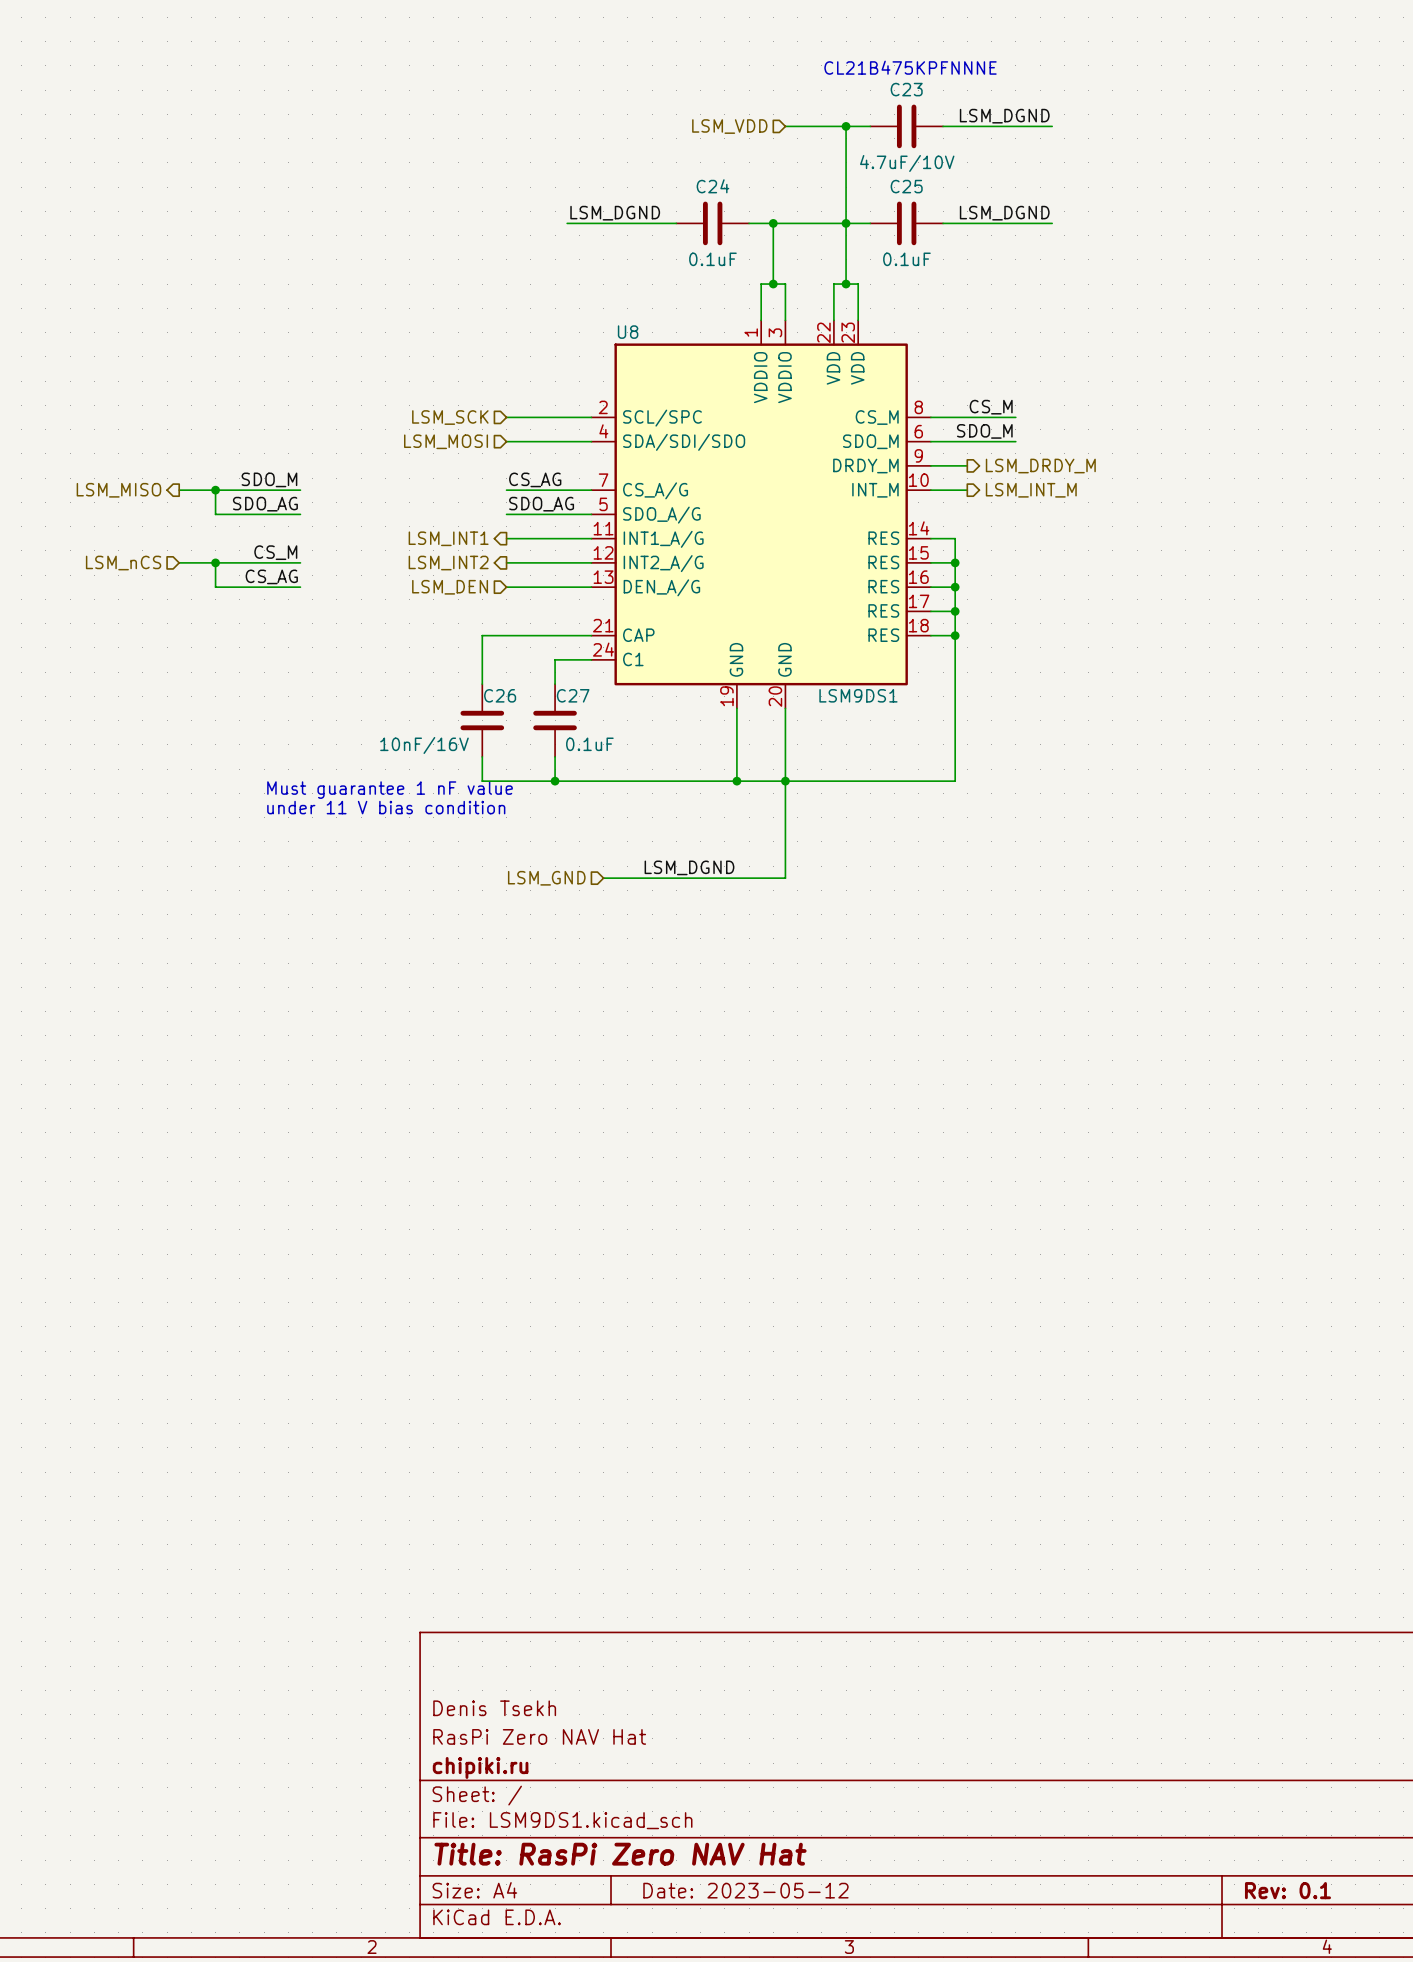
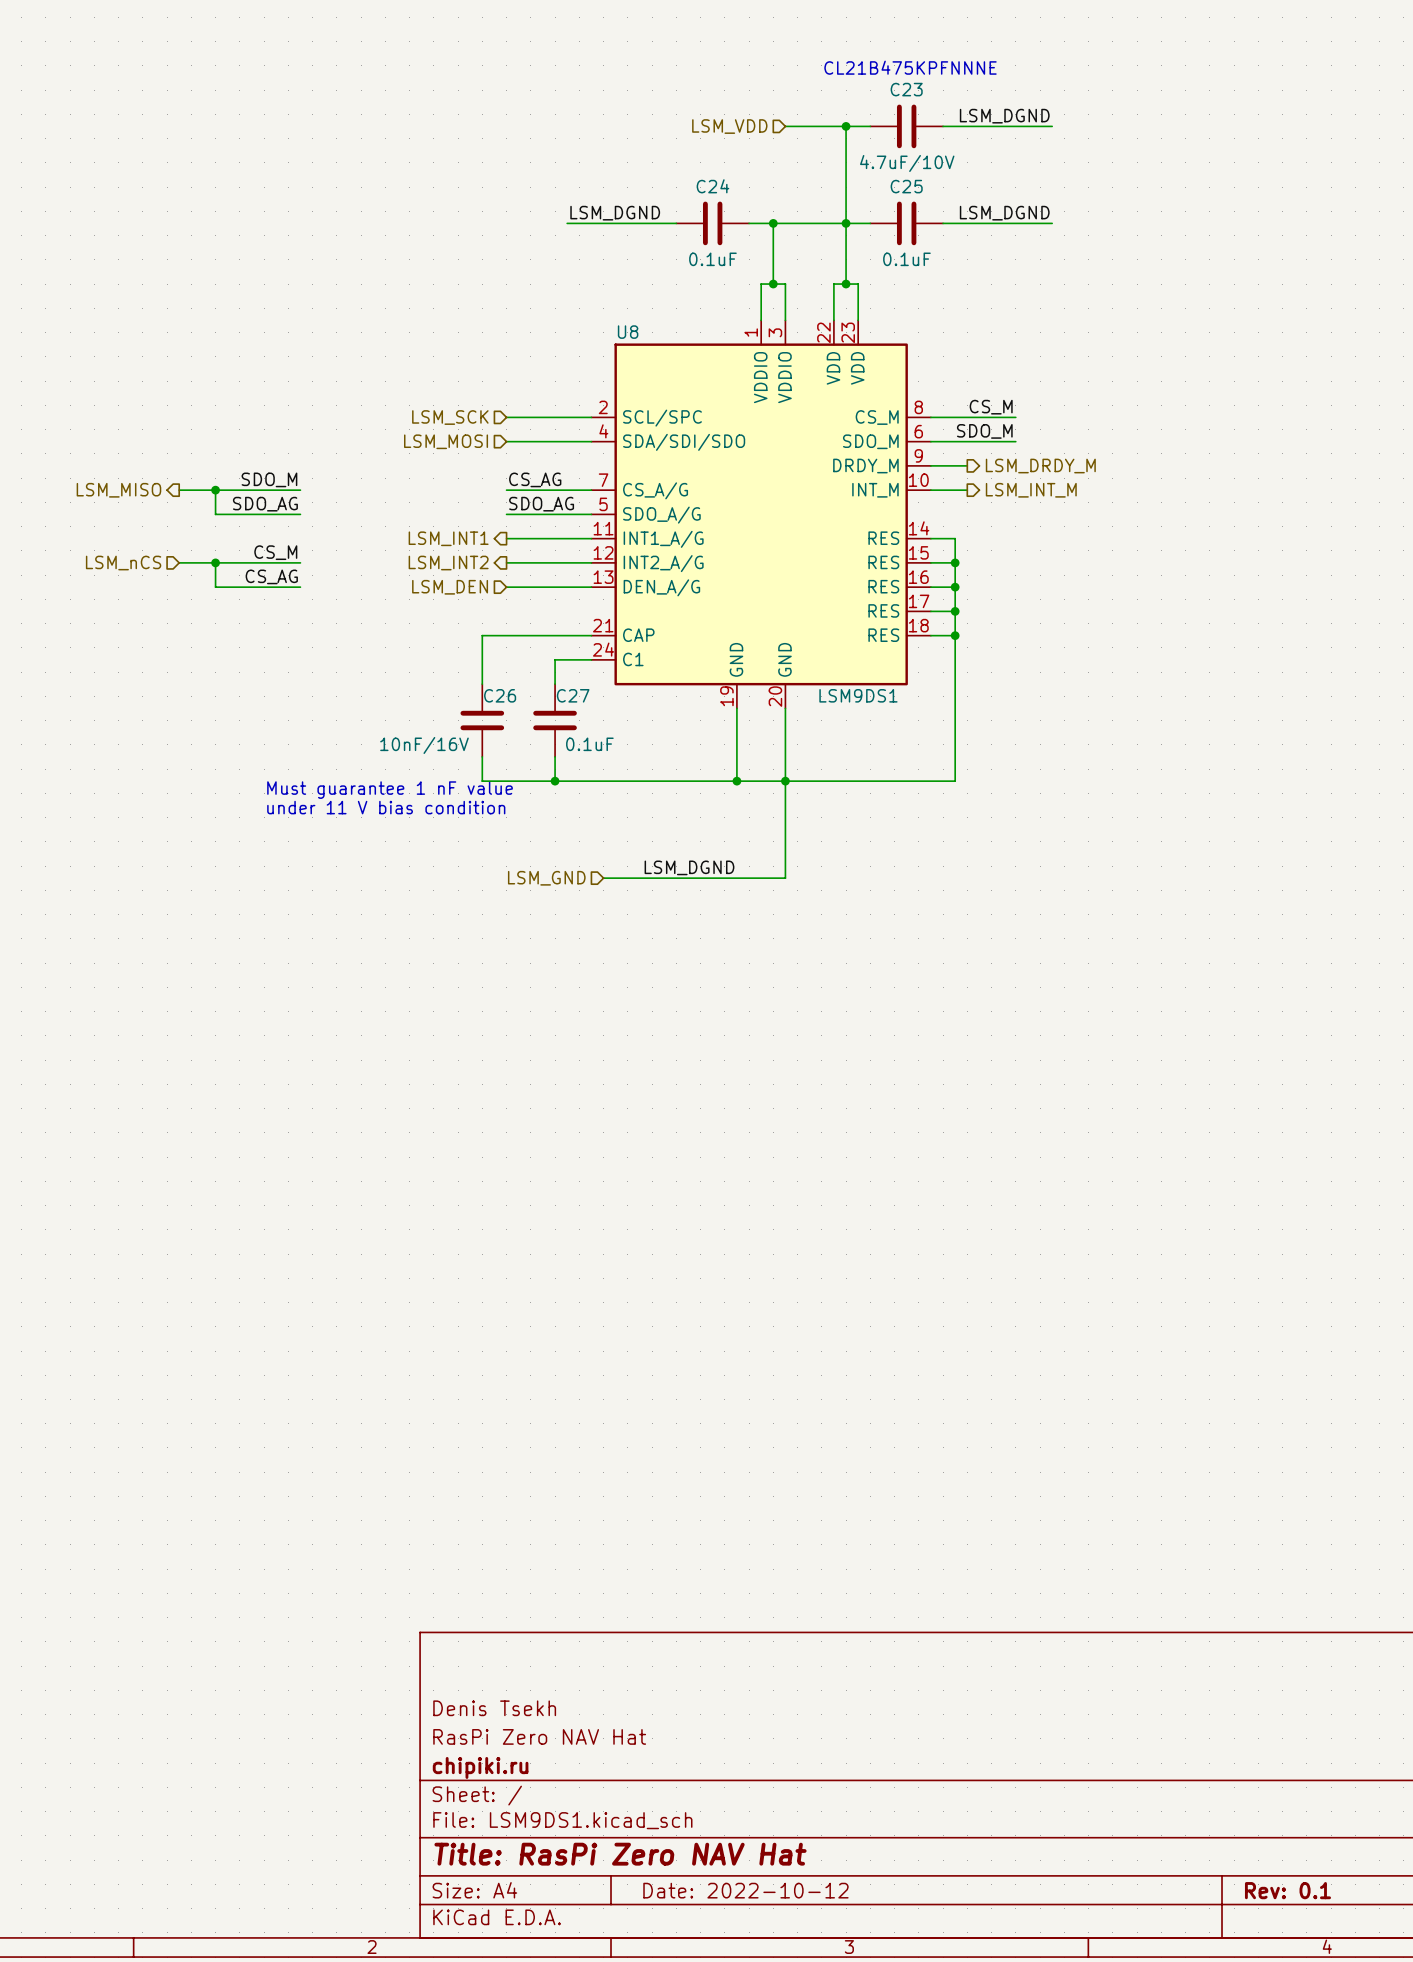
title block: Date: 2023-05-12 (745, 1890) -> Date: 2022-10-12 (745, 1890)

